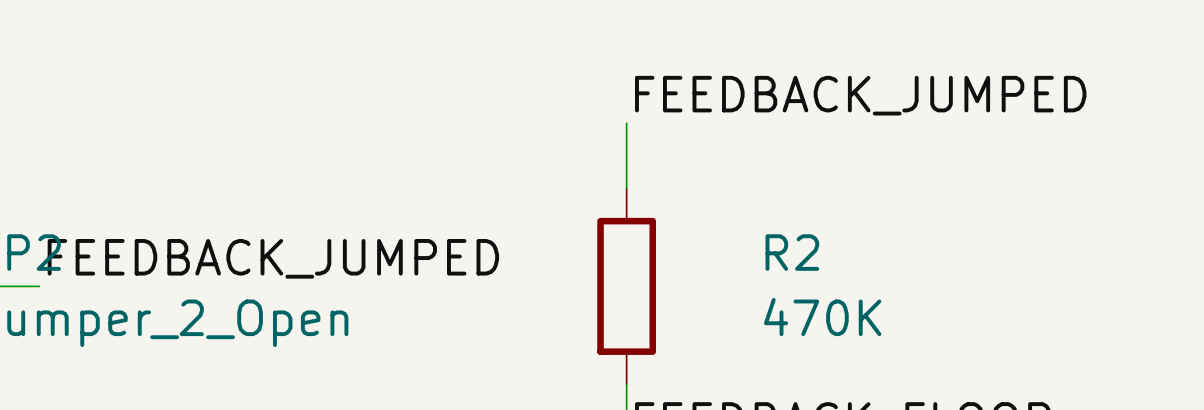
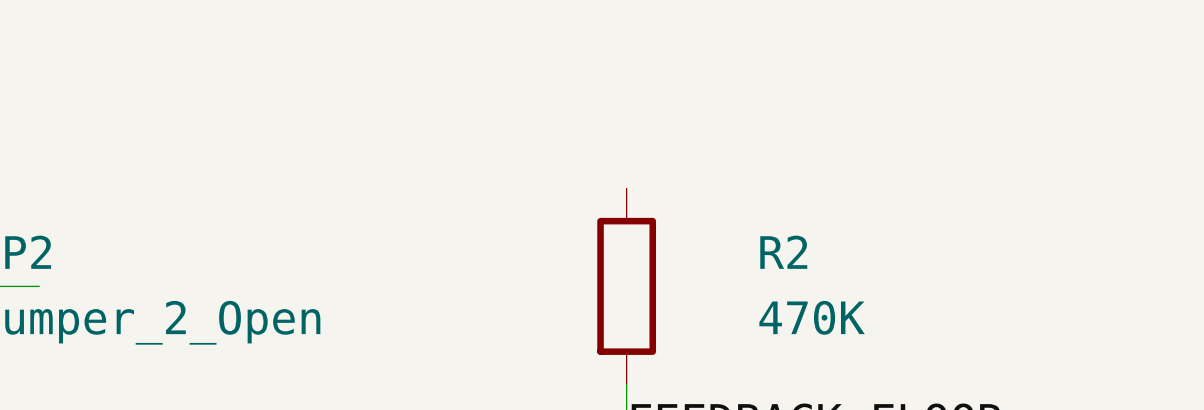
label: FEEDBACK_JUMPED (860, 95) -> none
wire: (626, 123) (626, 188) -> none
label: FEEDBACK_JUMPED (273, 258) -> none

